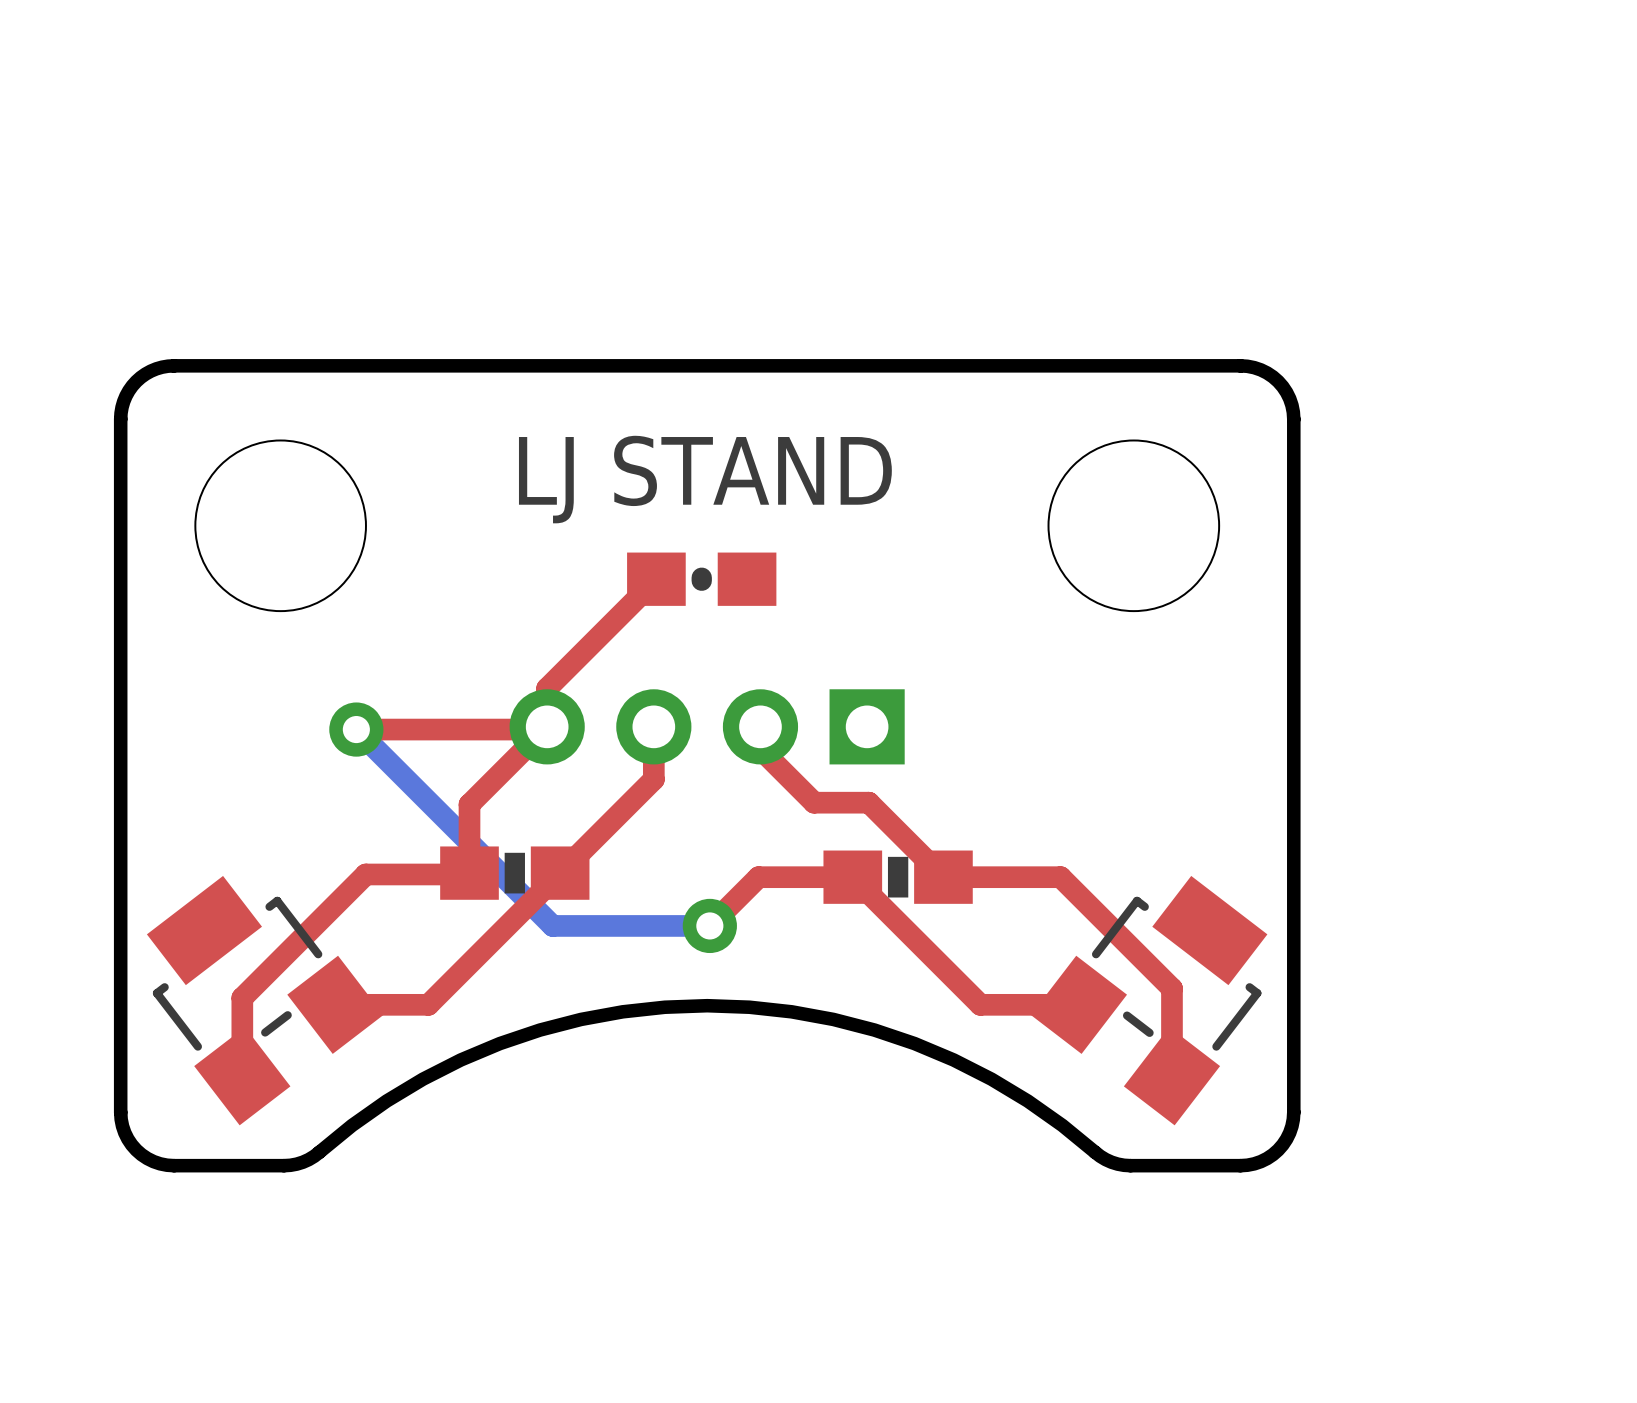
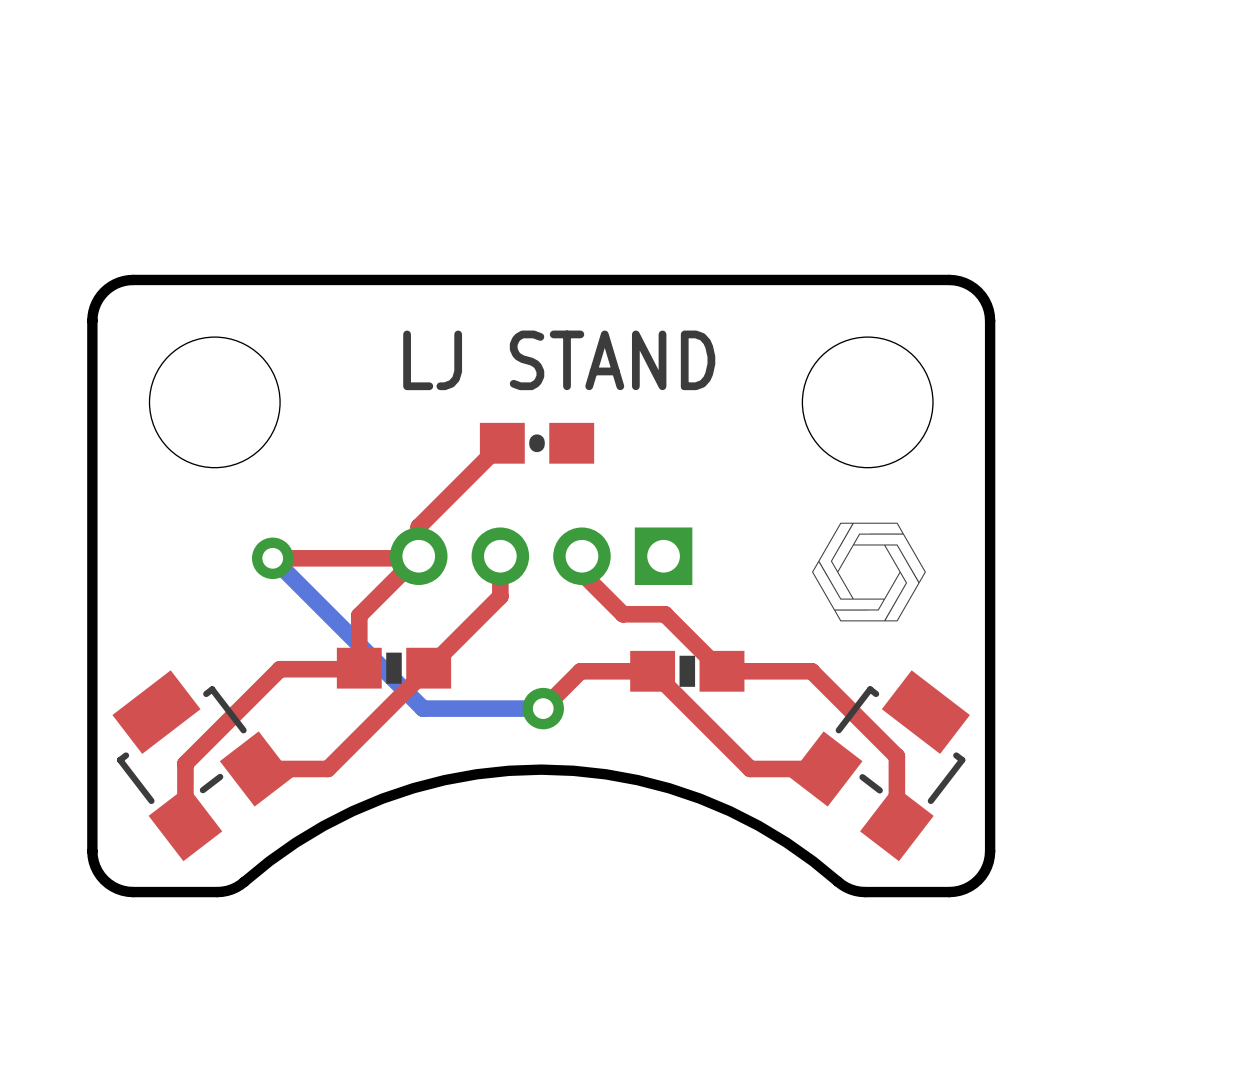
drawing: none -> [812, 522, 926, 622]

